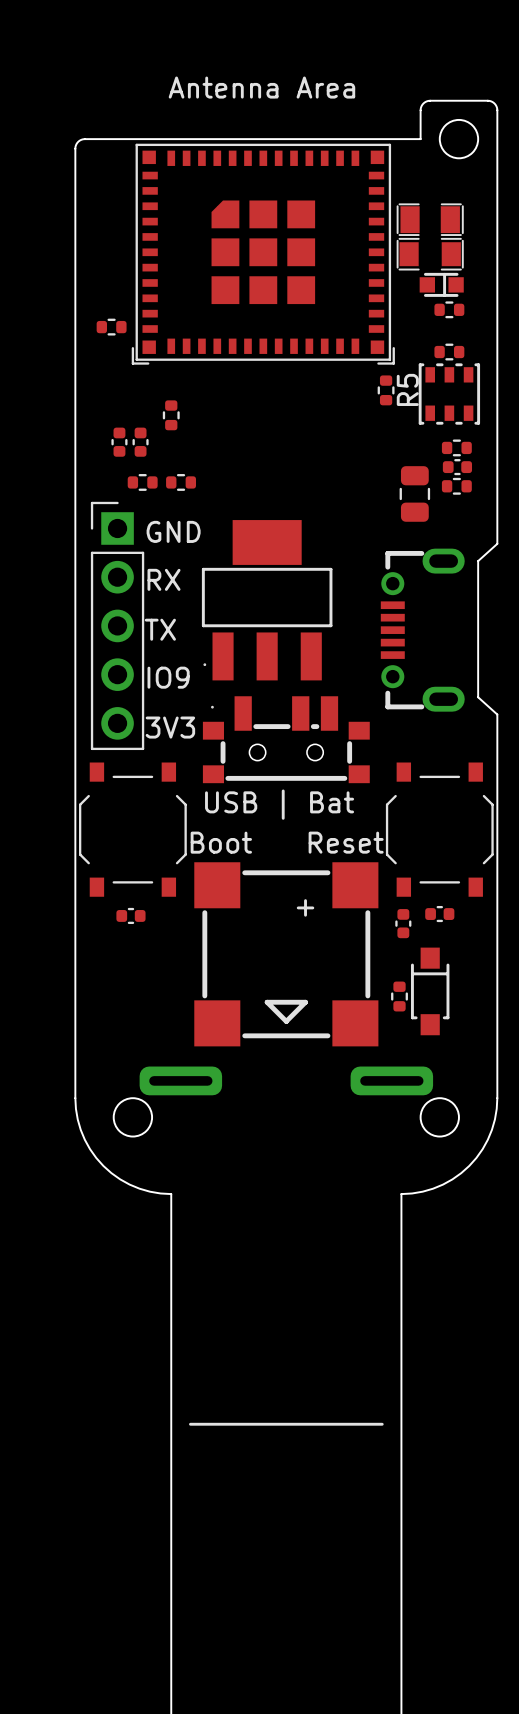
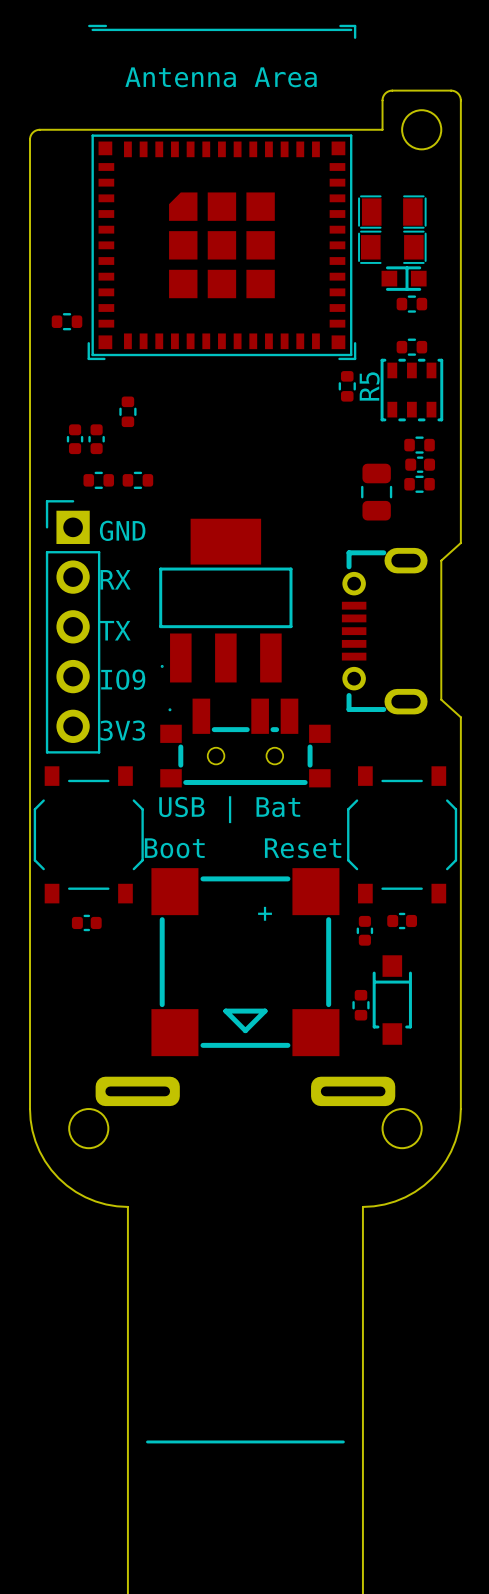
part: none -> (221, 192)

